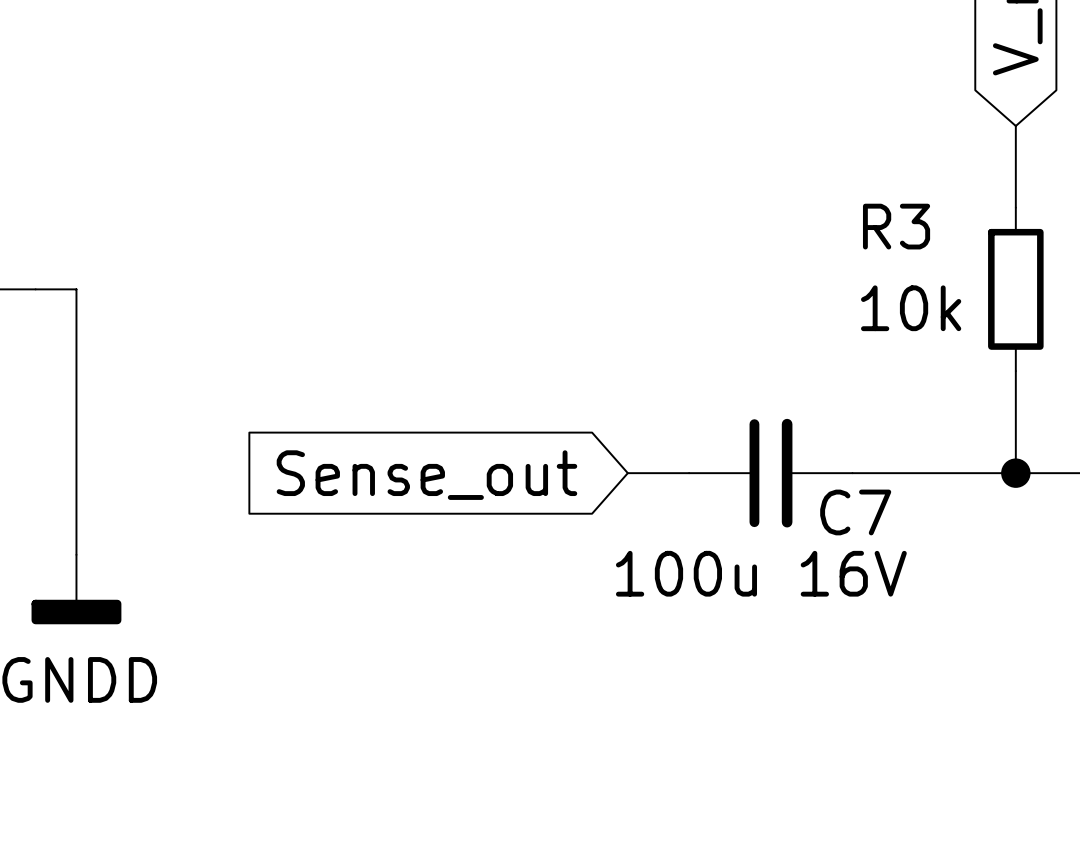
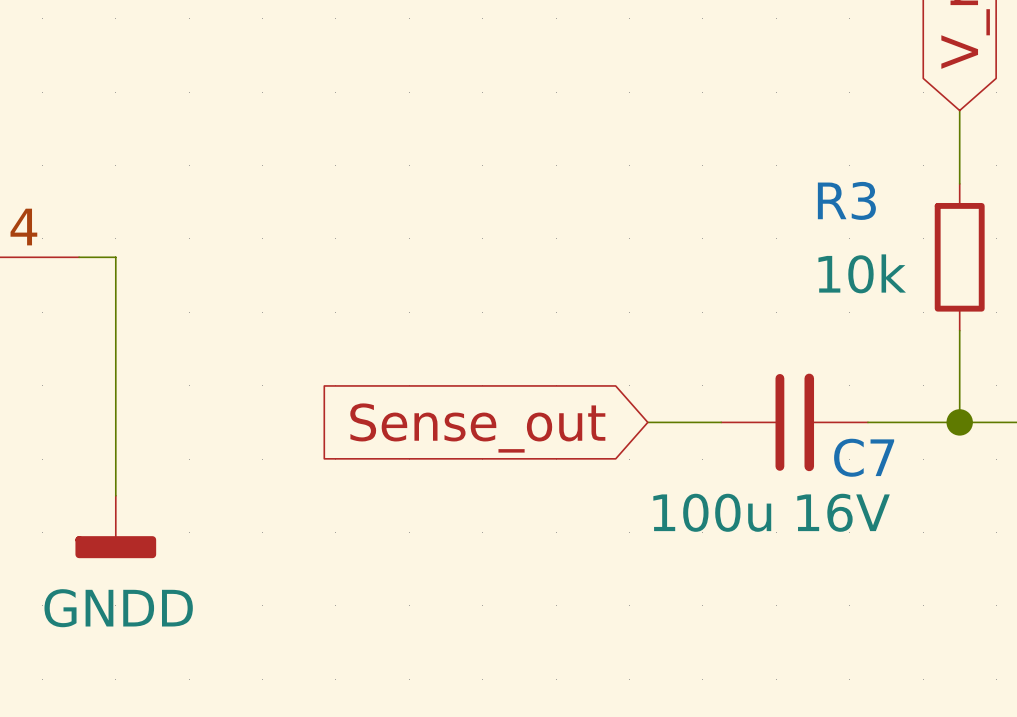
wire: (627, 473) (668, 473) -> none
C7 position: (770, 473) -> (794, 422)
global label position: Sense_out (426, 475) -> Sense_out (477, 428)

